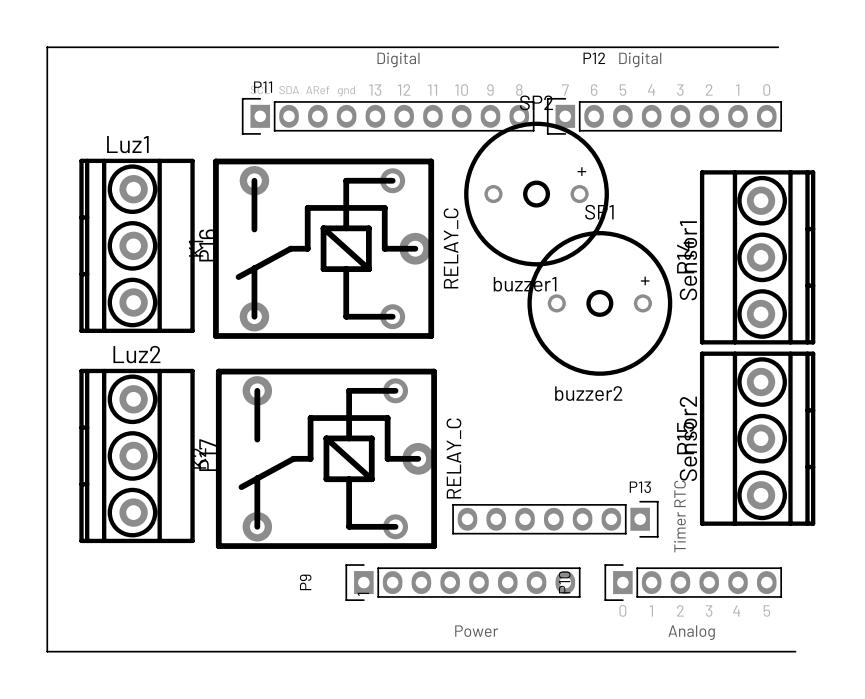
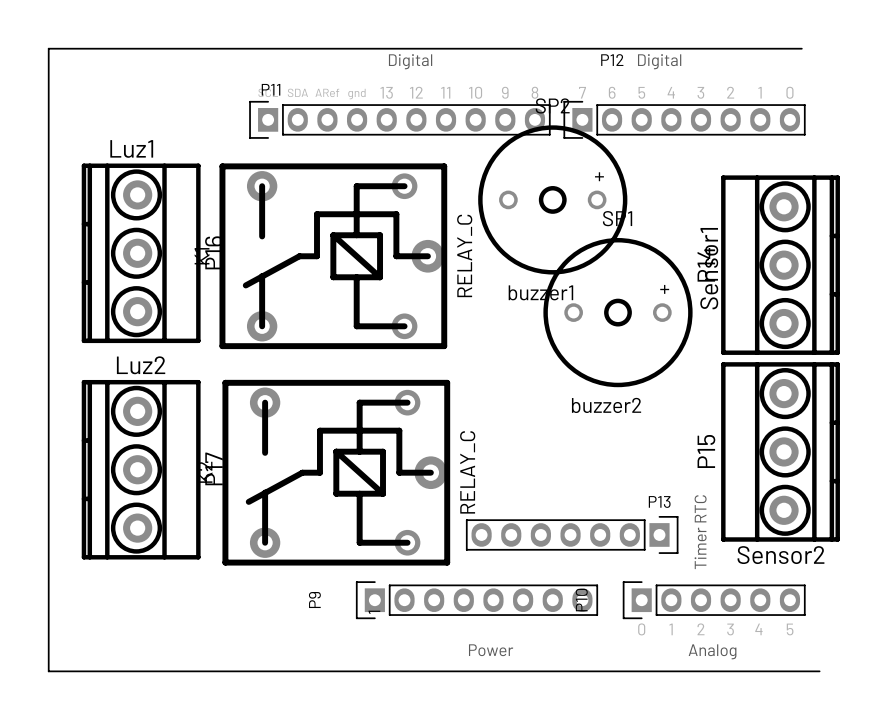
P15 value rotation: 0° (688, 438) -> 90° clockwise (780, 555)
P15 value position: Sensor2 (688, 438) -> Sensor2 (780, 555)

